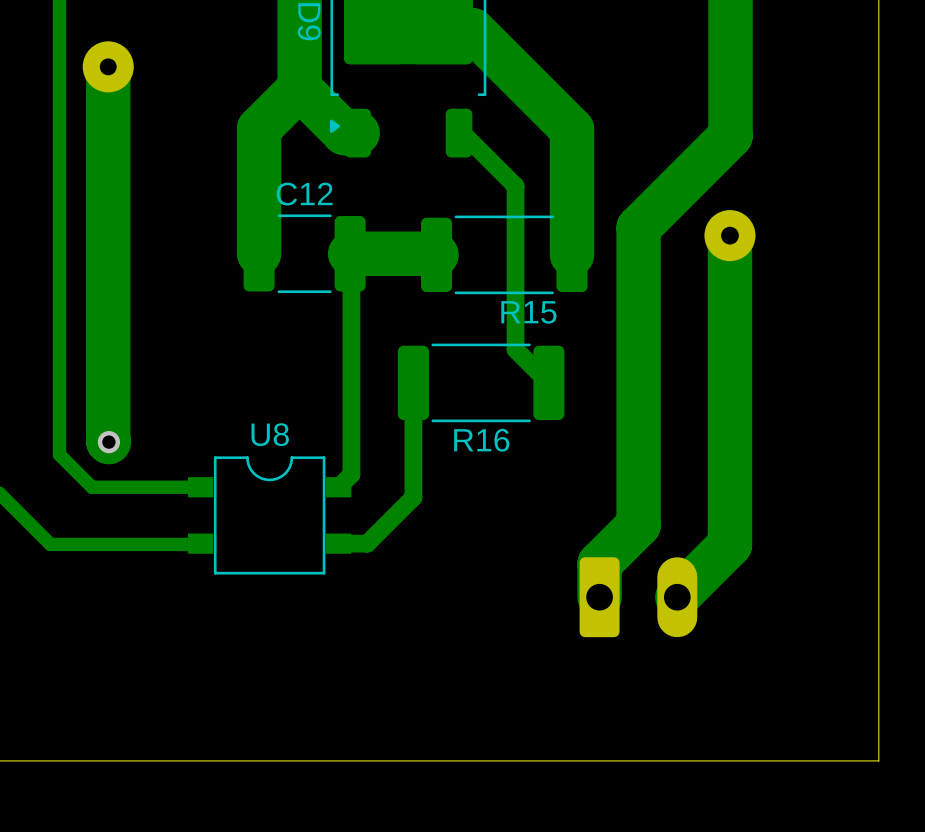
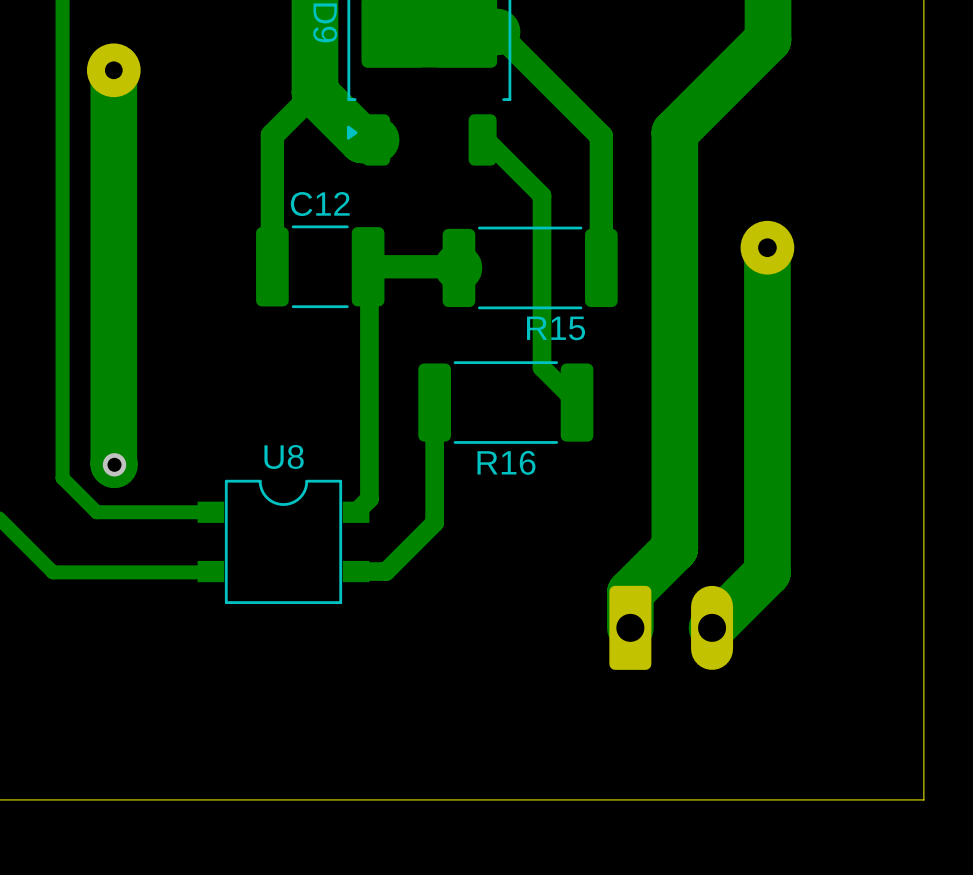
track width: thick (472, 30) (571, 129) (571, 254) -> thin (497, 31) (601, 136) (601, 267)
track: (730, 37) (730, 135) (638, 227) (638, 524) -> (768, 39) (674, 132) (674, 548) (671, 551)
track width: thick (299, 88) (259, 128) (259, 253) -> thin (314, 92) (272, 135) (272, 266)
track width: thick (435, 253) (350, 253) -> thin (457, 266) (368, 266)

